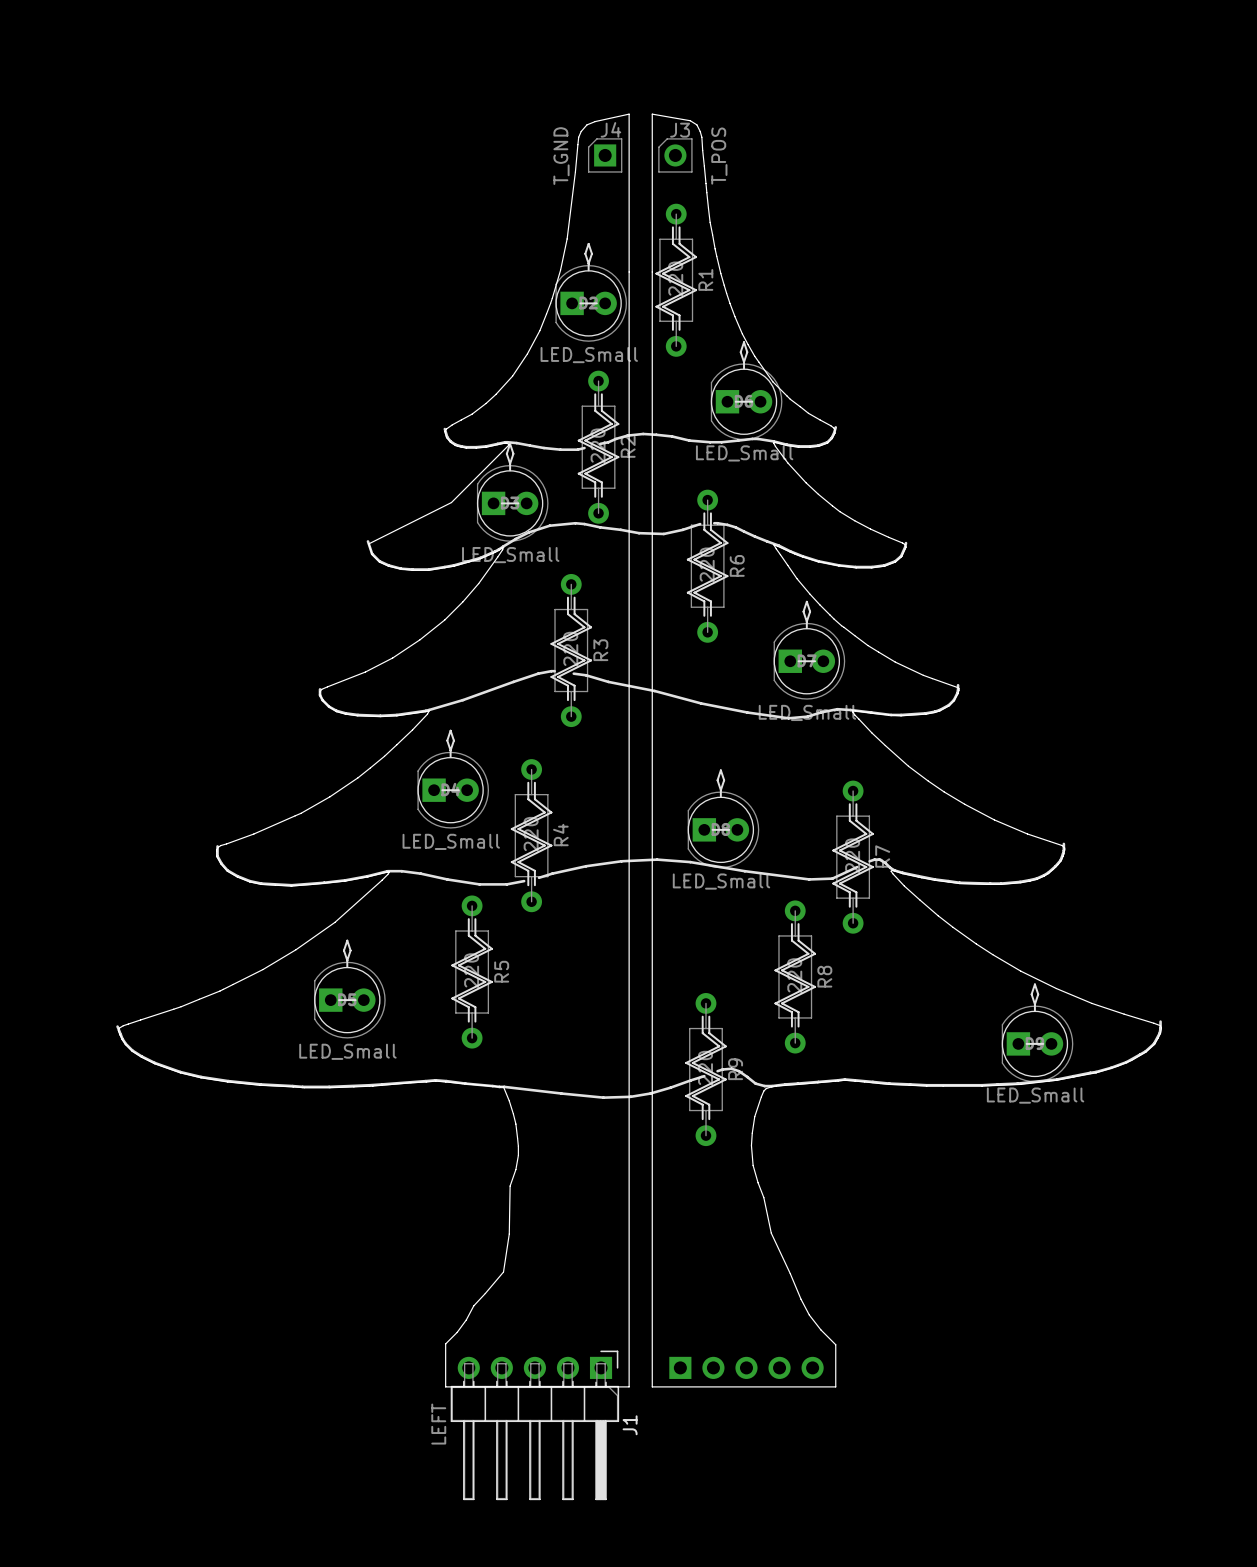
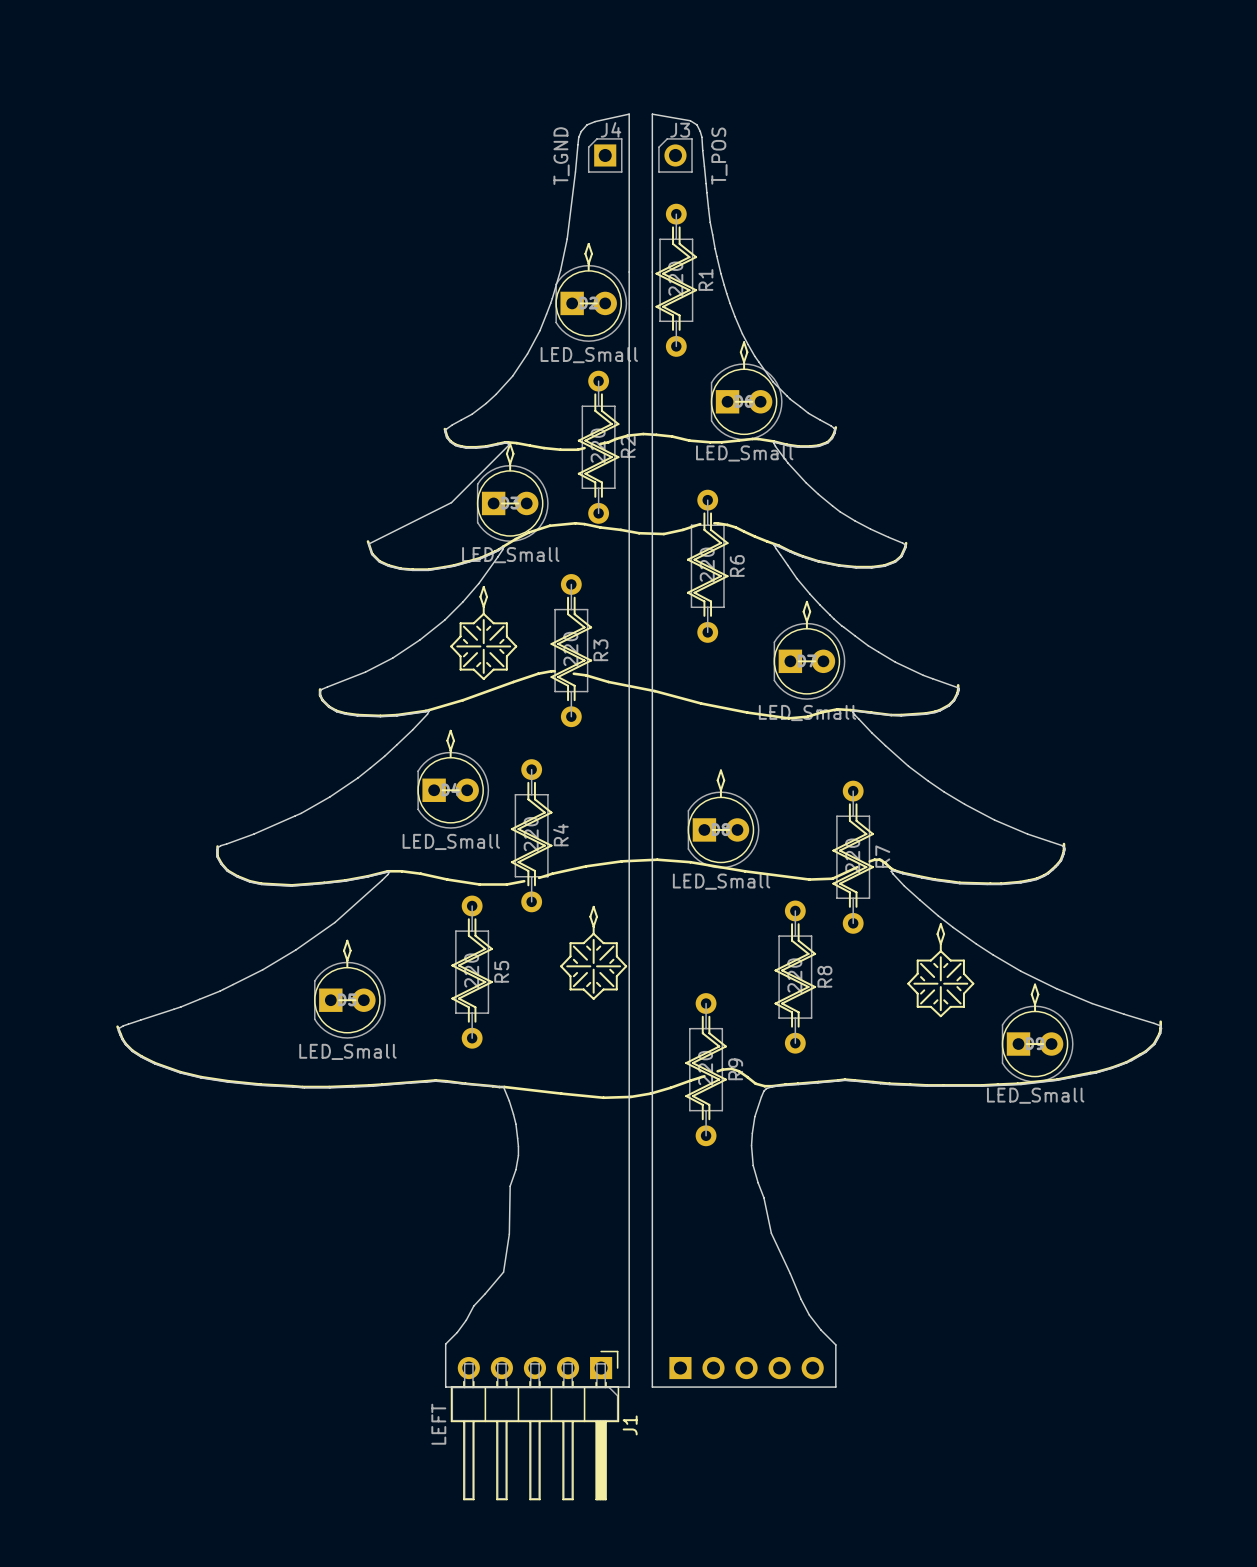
drawing: none -> [450, 585, 518, 680]
drawing: none -> [560, 905, 628, 1000]
drawing: none -> [907, 923, 975, 1018]

